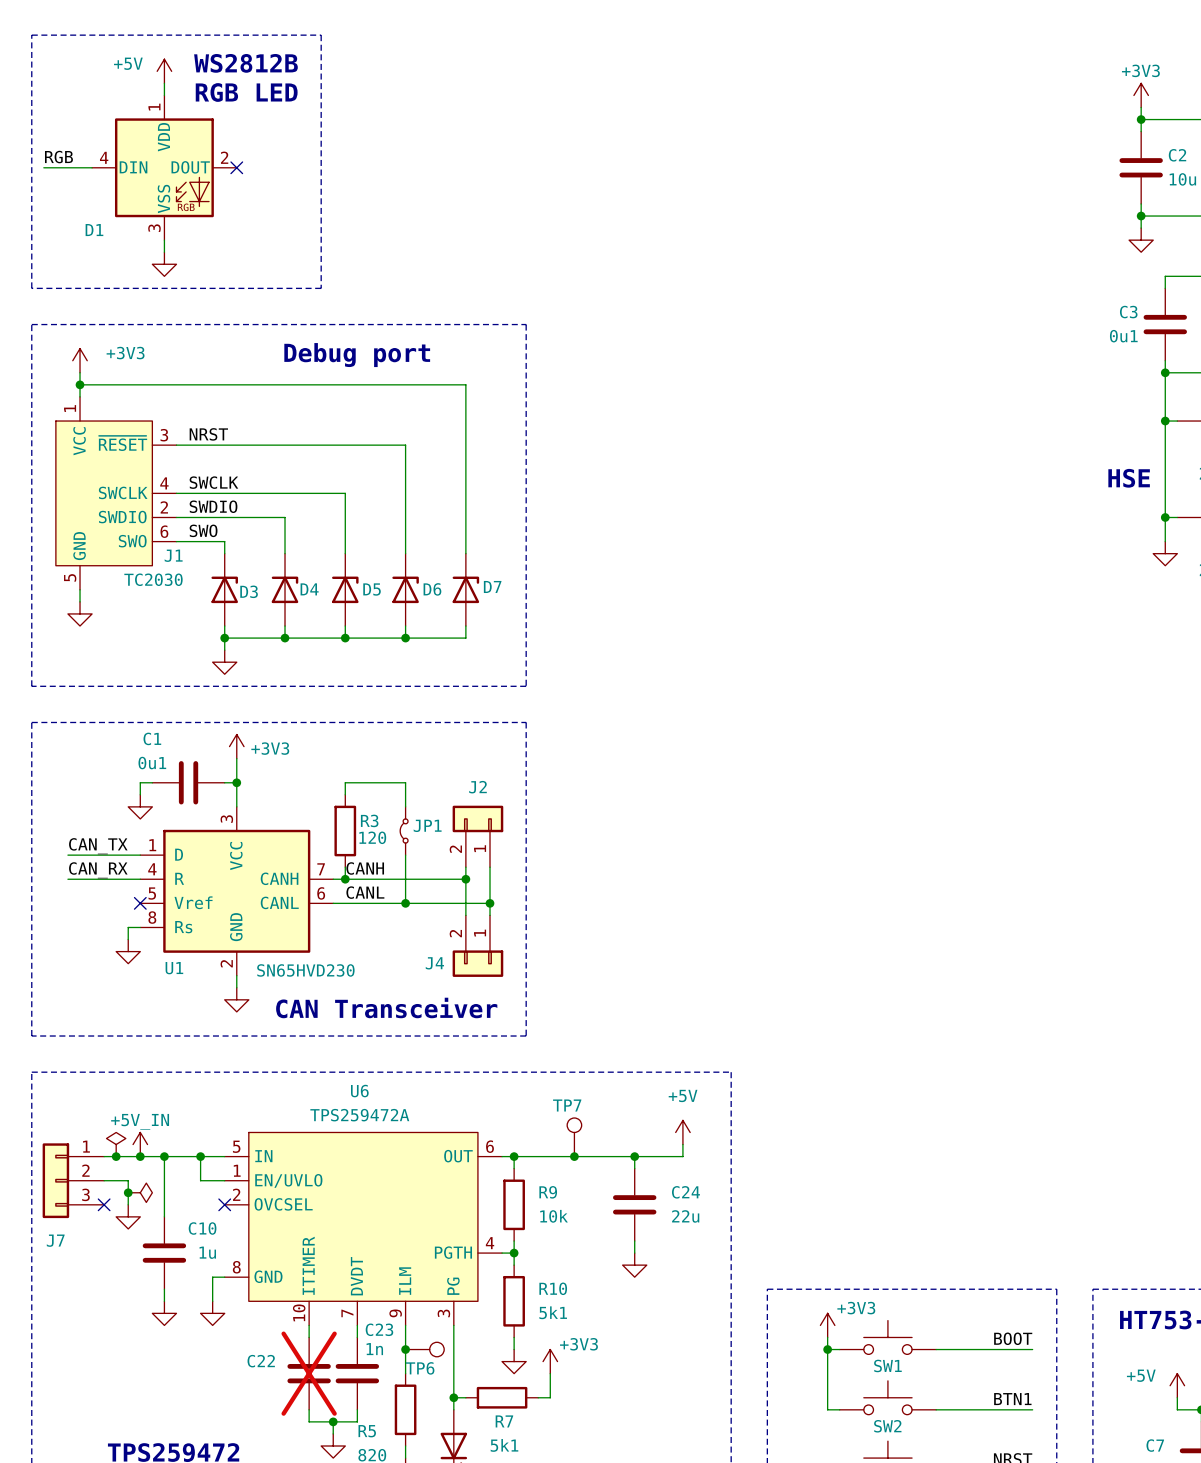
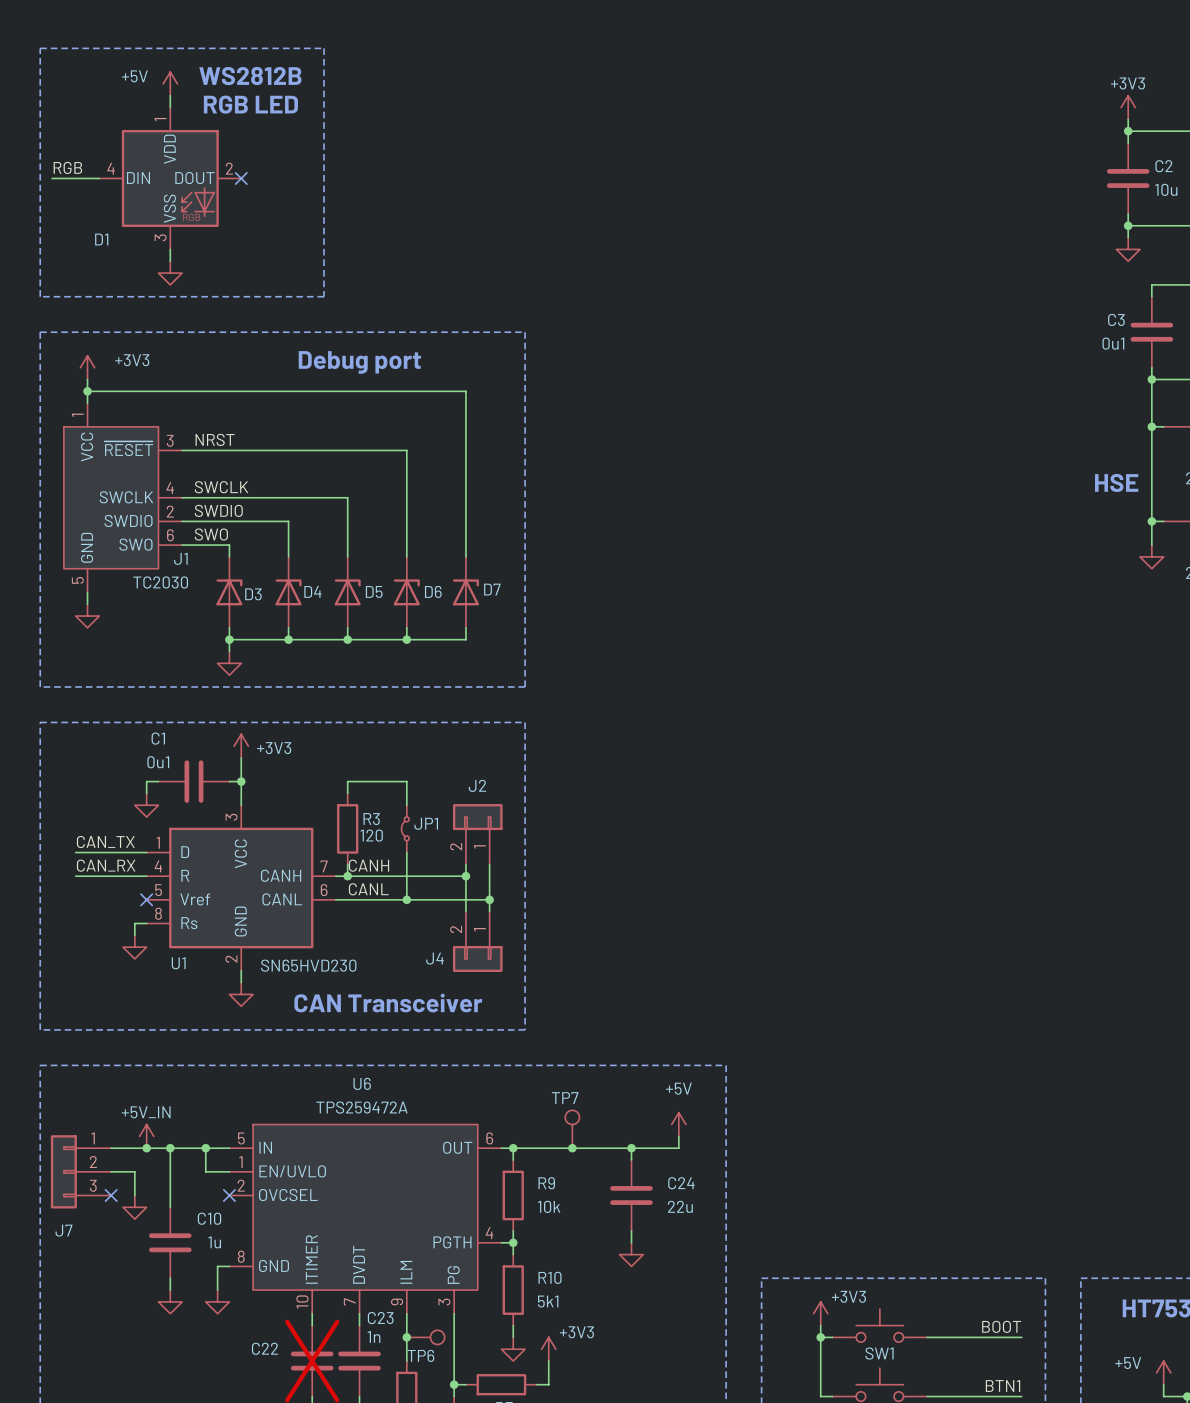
power symbol: (116, 1144) -> none
junction: (116, 1156) -> none
junction: (128, 1192) -> none
power symbol: (140, 1192) -> none

